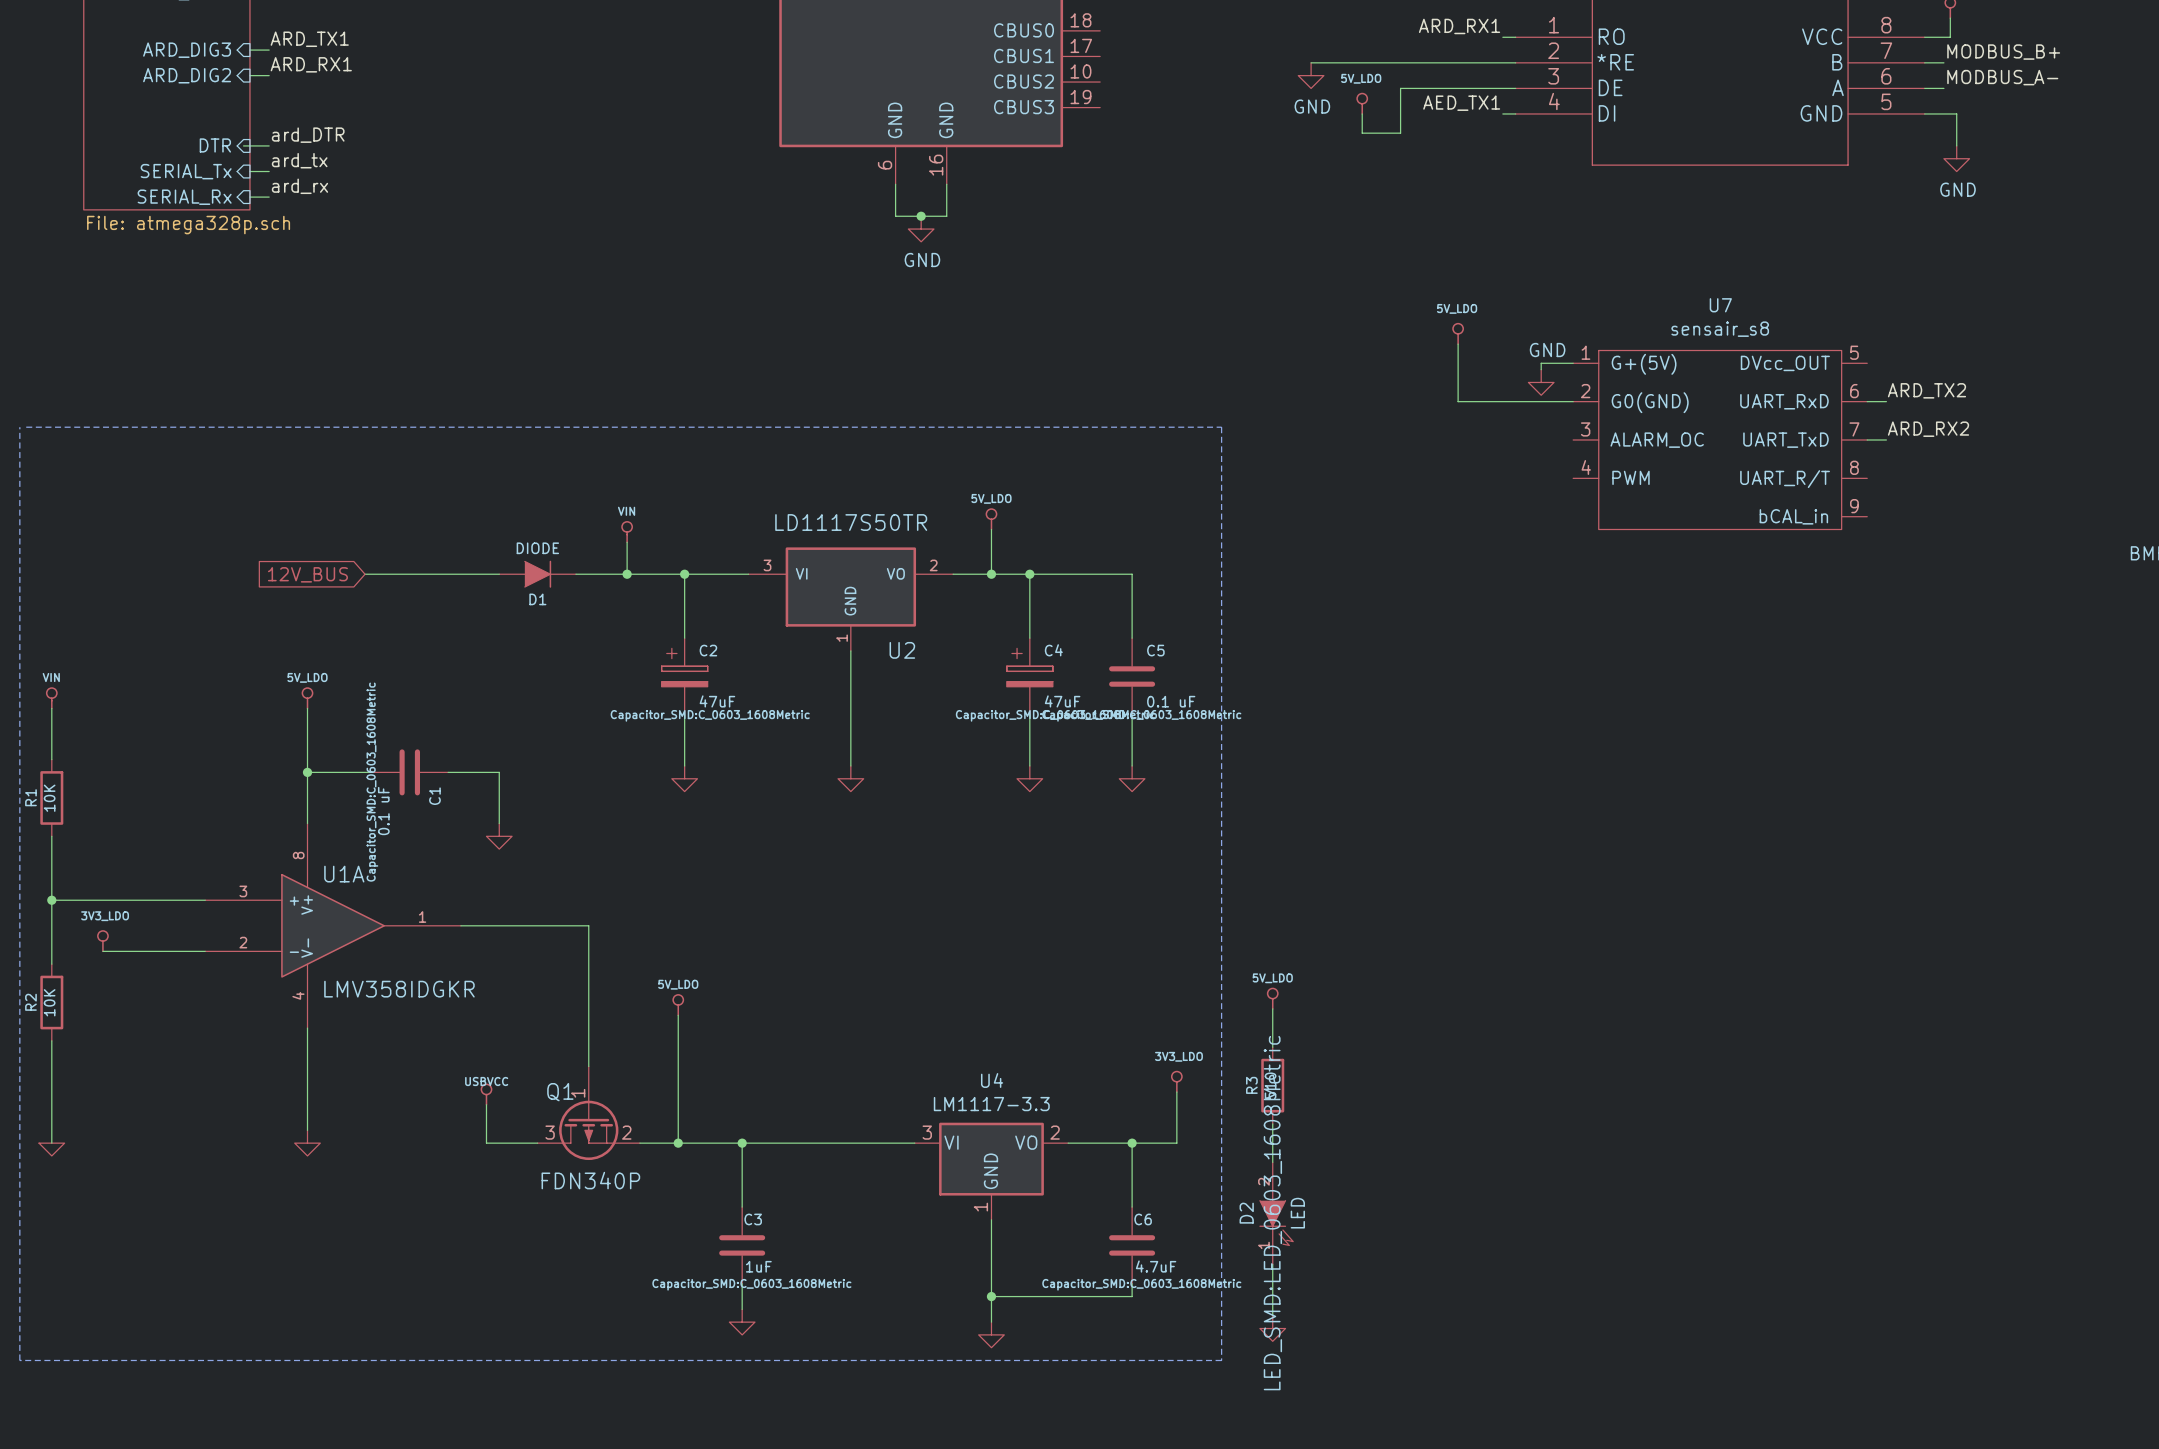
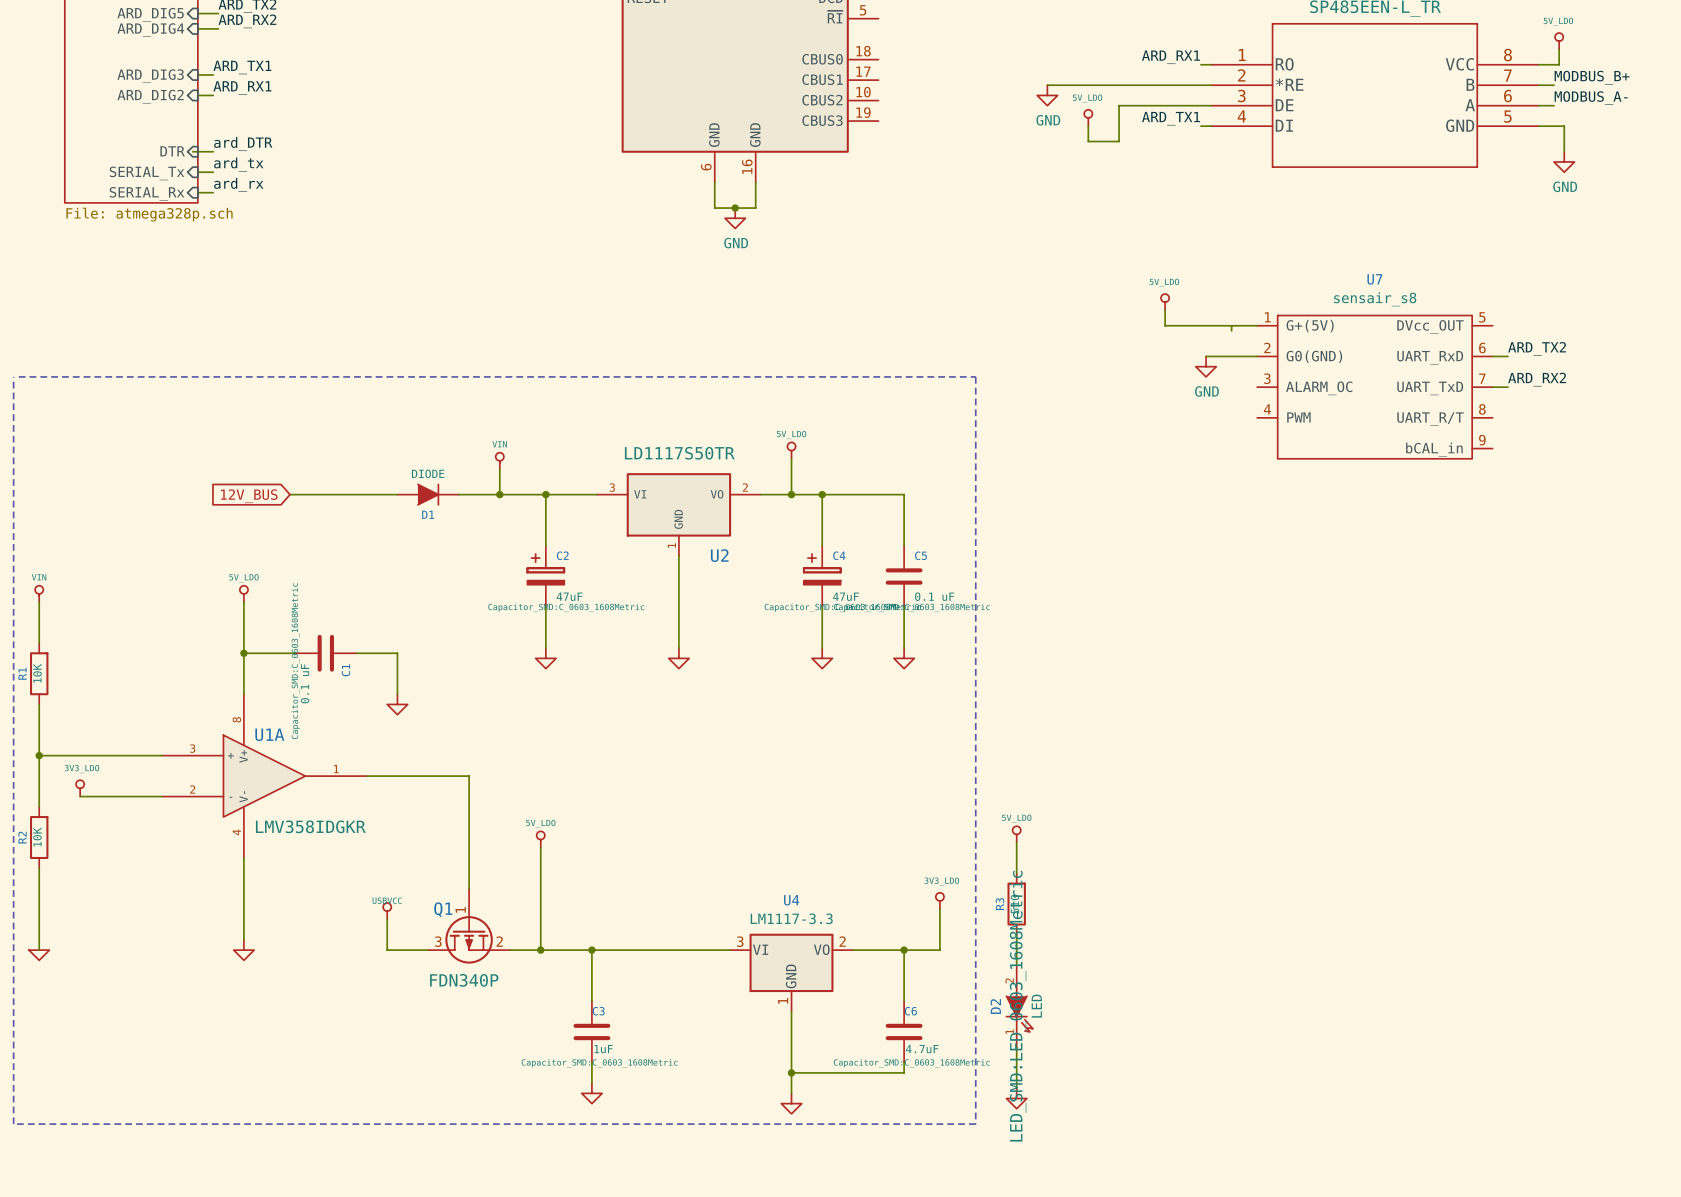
label: AED_TX1 (1461, 103) -> ARD_TX1 (1170, 118)
power symbol text position: GND (1547, 350) -> GND (1206, 391)
wire: (1458, 363) (1458, 401) (1509, 401) -> (1165, 325) (1231, 325)
power symbol position: GND (1541, 382) -> GND (1206, 366)

